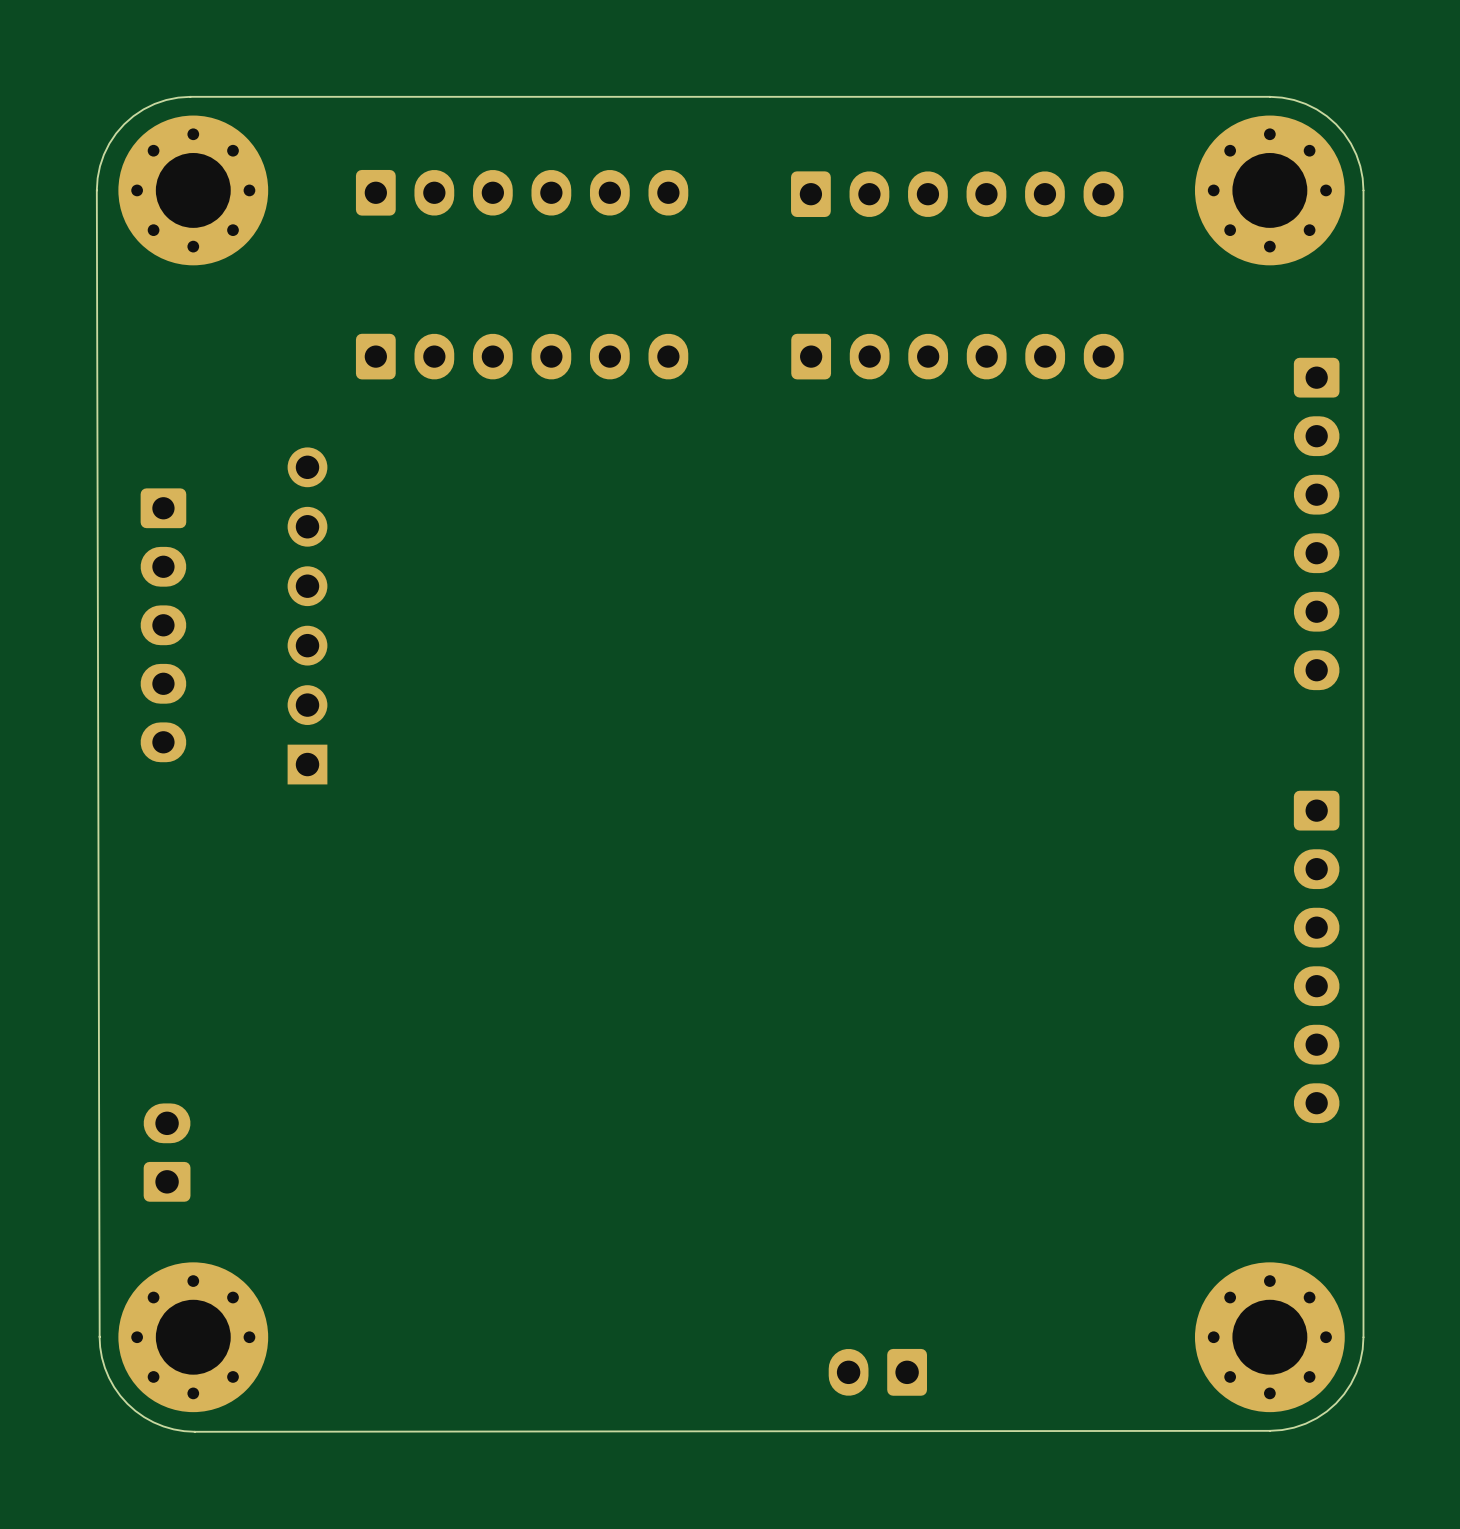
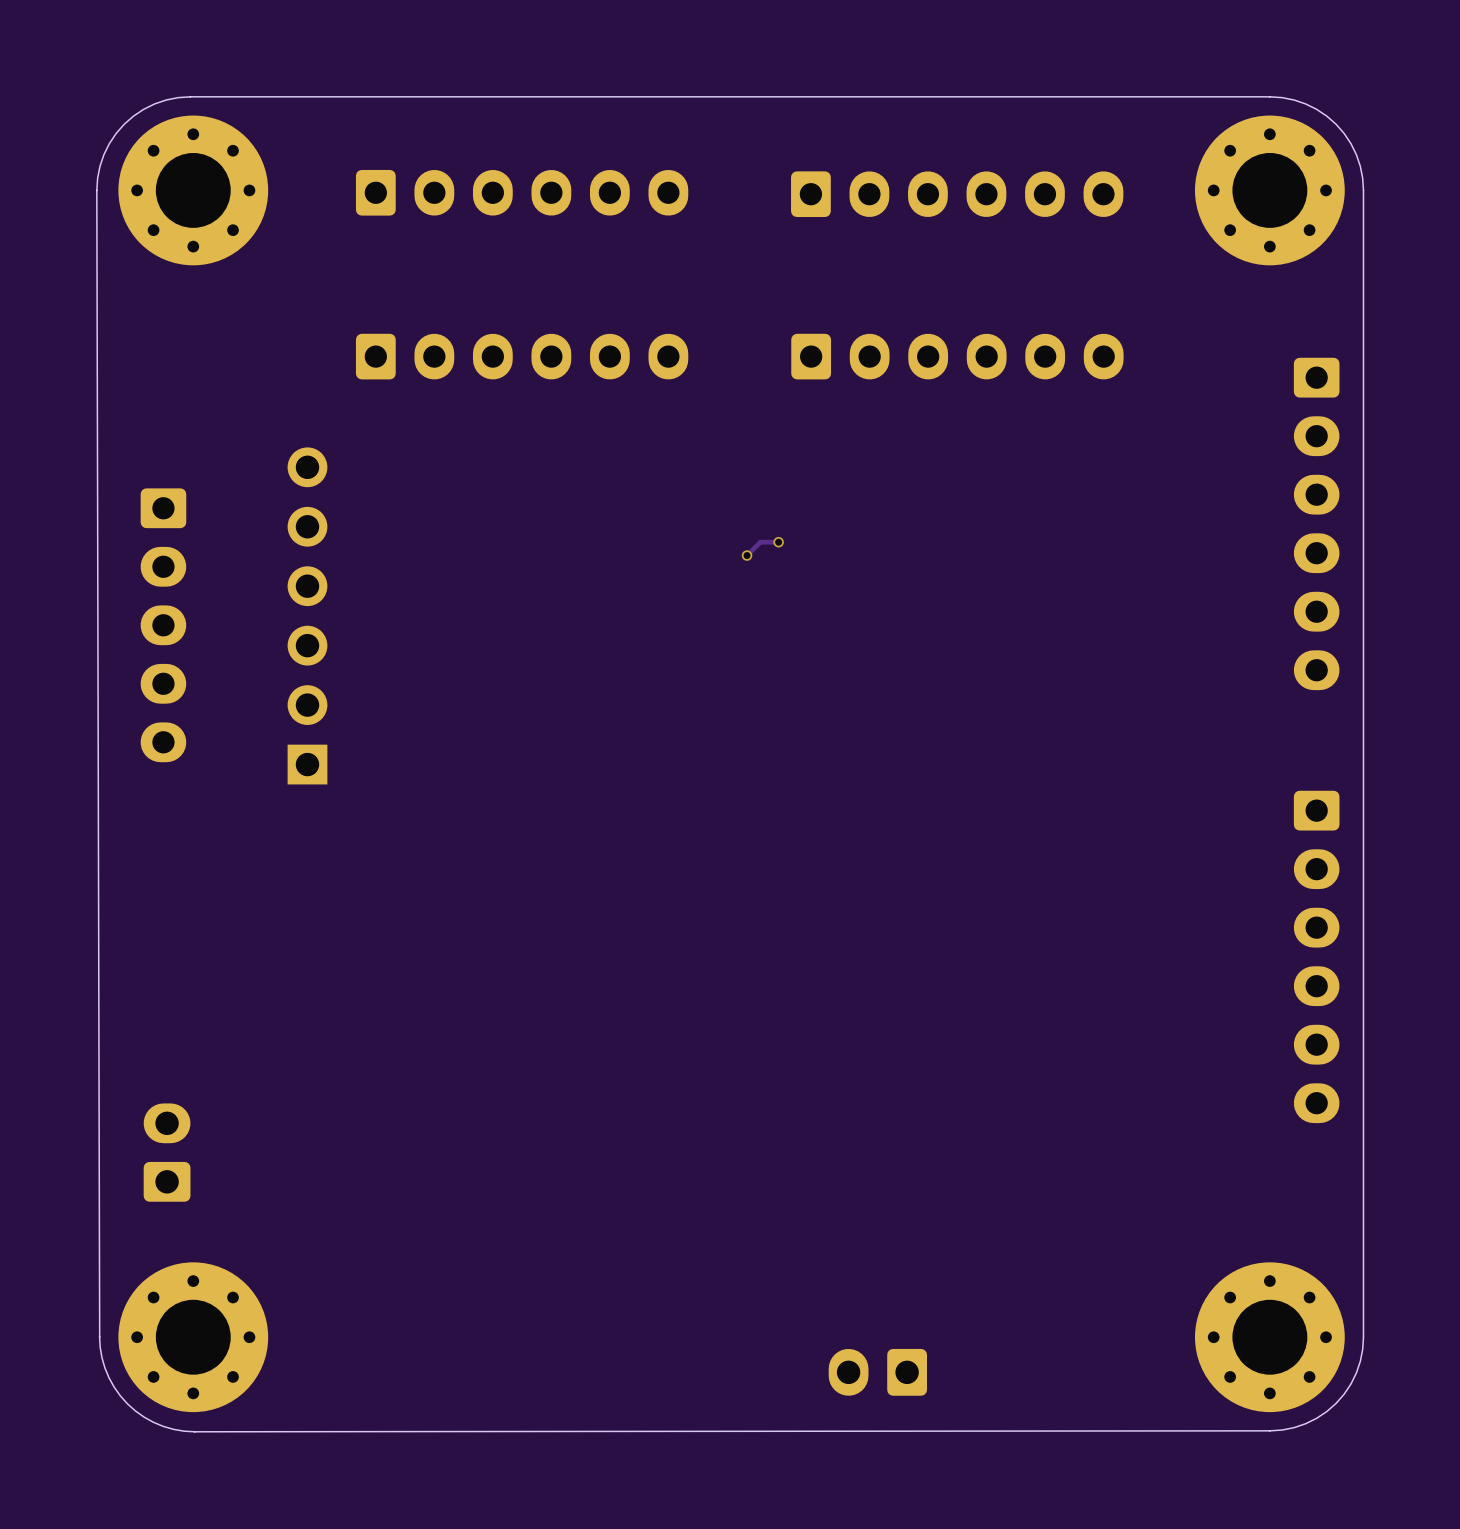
track: none -> (778, 542) (760, 542) (747, 555)
via: none -> (778, 542)
via: none -> (747, 555)

